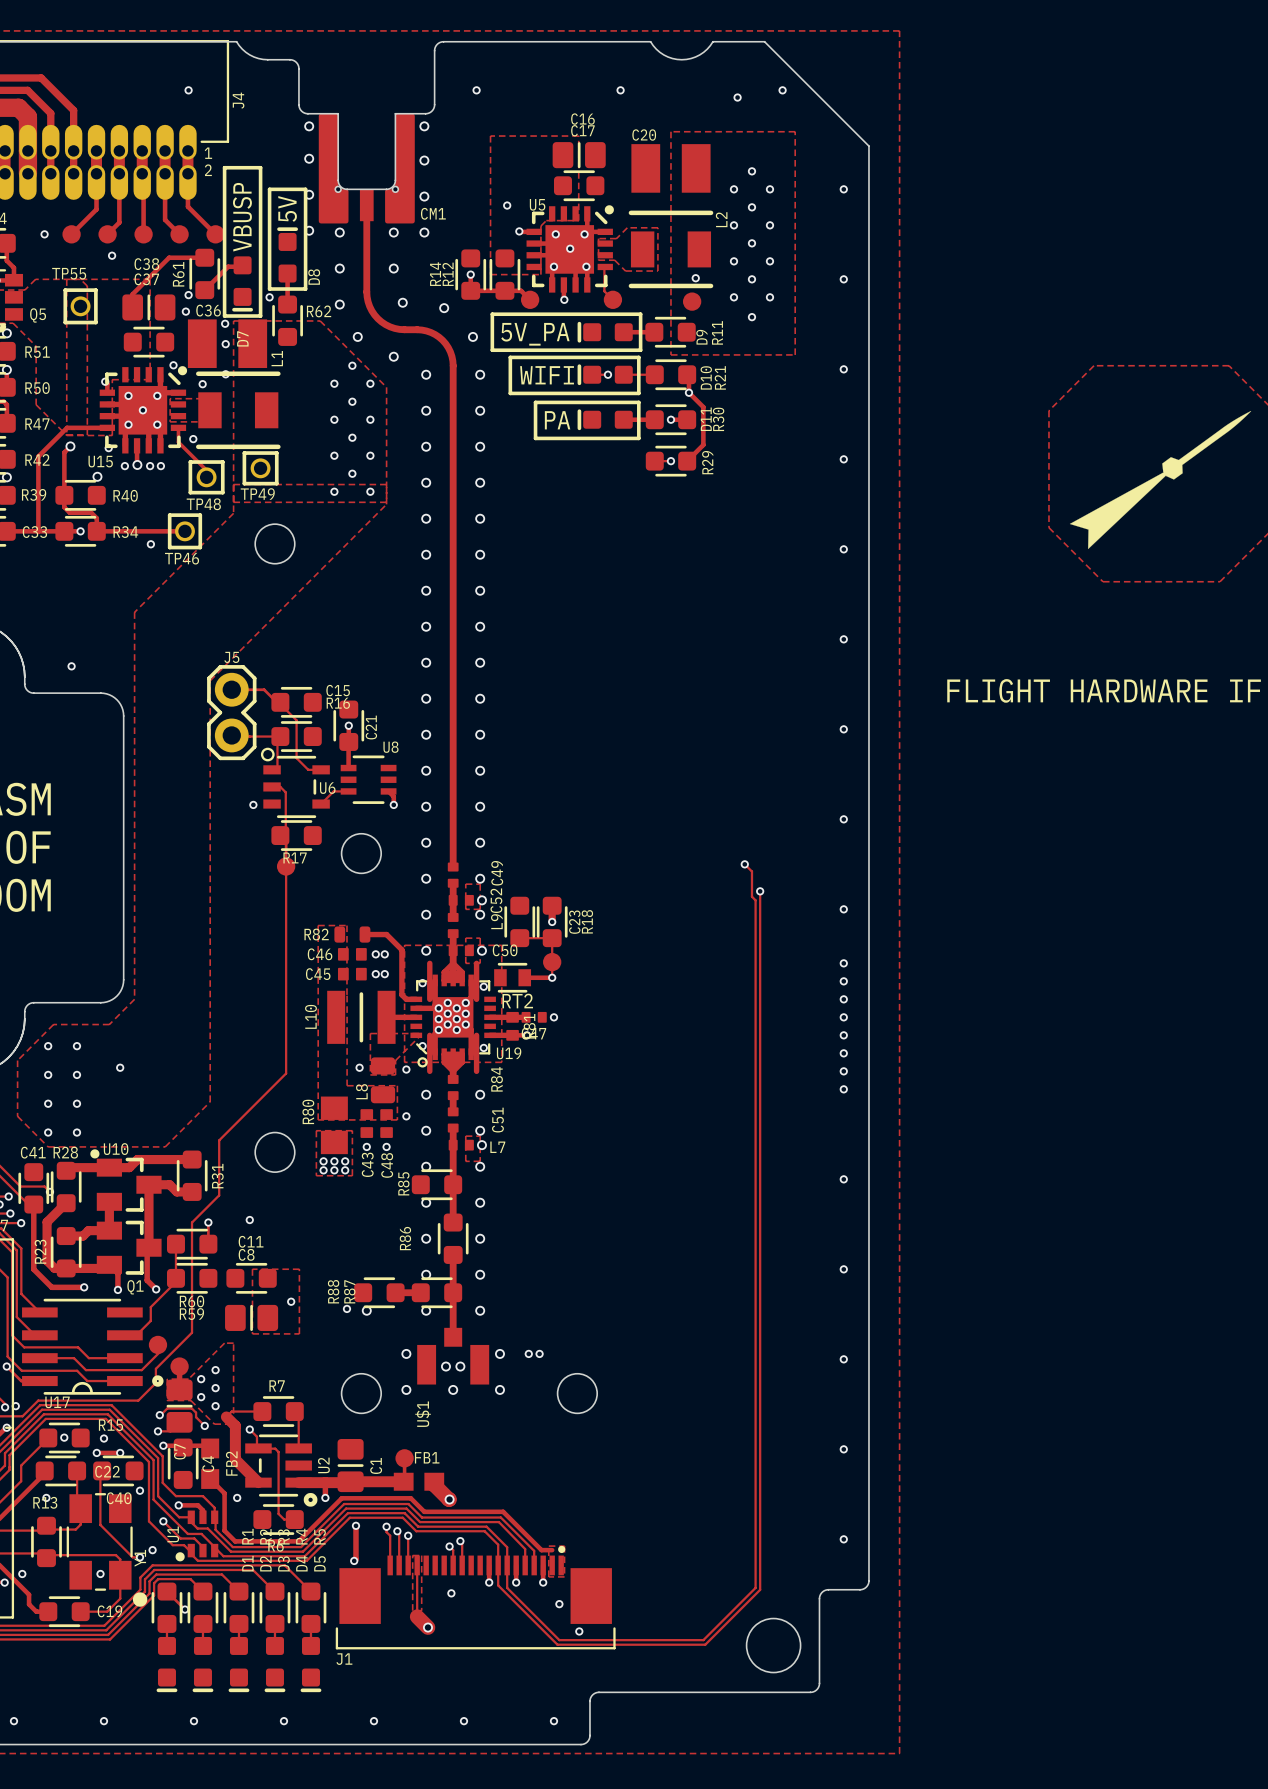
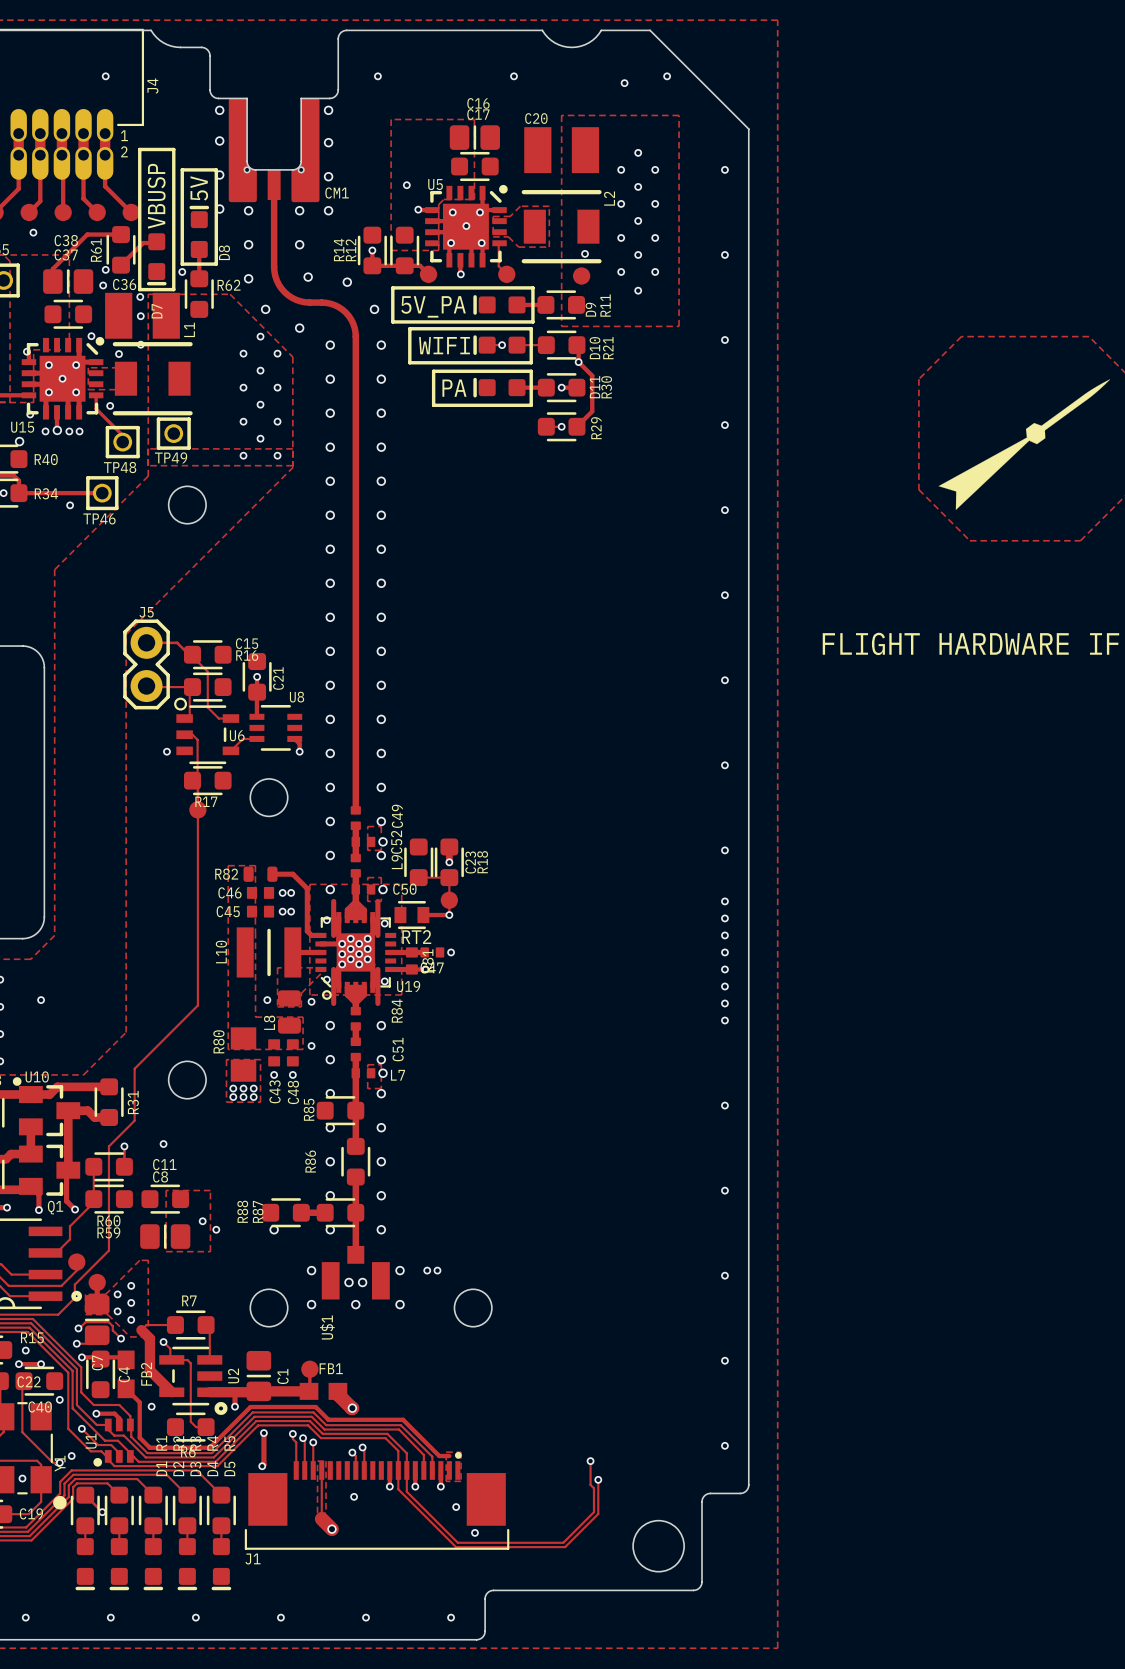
track: (744, 864) (751, 871) (751, 896) (755, 900) (755, 1587) (703, 1640) (559, 1640) -> (590, 1461) (590, 1484) (593, 1488) (593, 1512) (563, 1542) (457, 1542) (456, 1541)
via: (744, 864) -> none
track: (760, 891) (760, 1589) (705, 1644) (557, 1644) -> (598, 1479) (598, 1513) (565, 1547) (456, 1547) (454, 1545)
via: (760, 891) -> none
via position: (346, 1308) -> (216, 1229)
via: none -> (590, 1461)
via: none -> (598, 1479)

